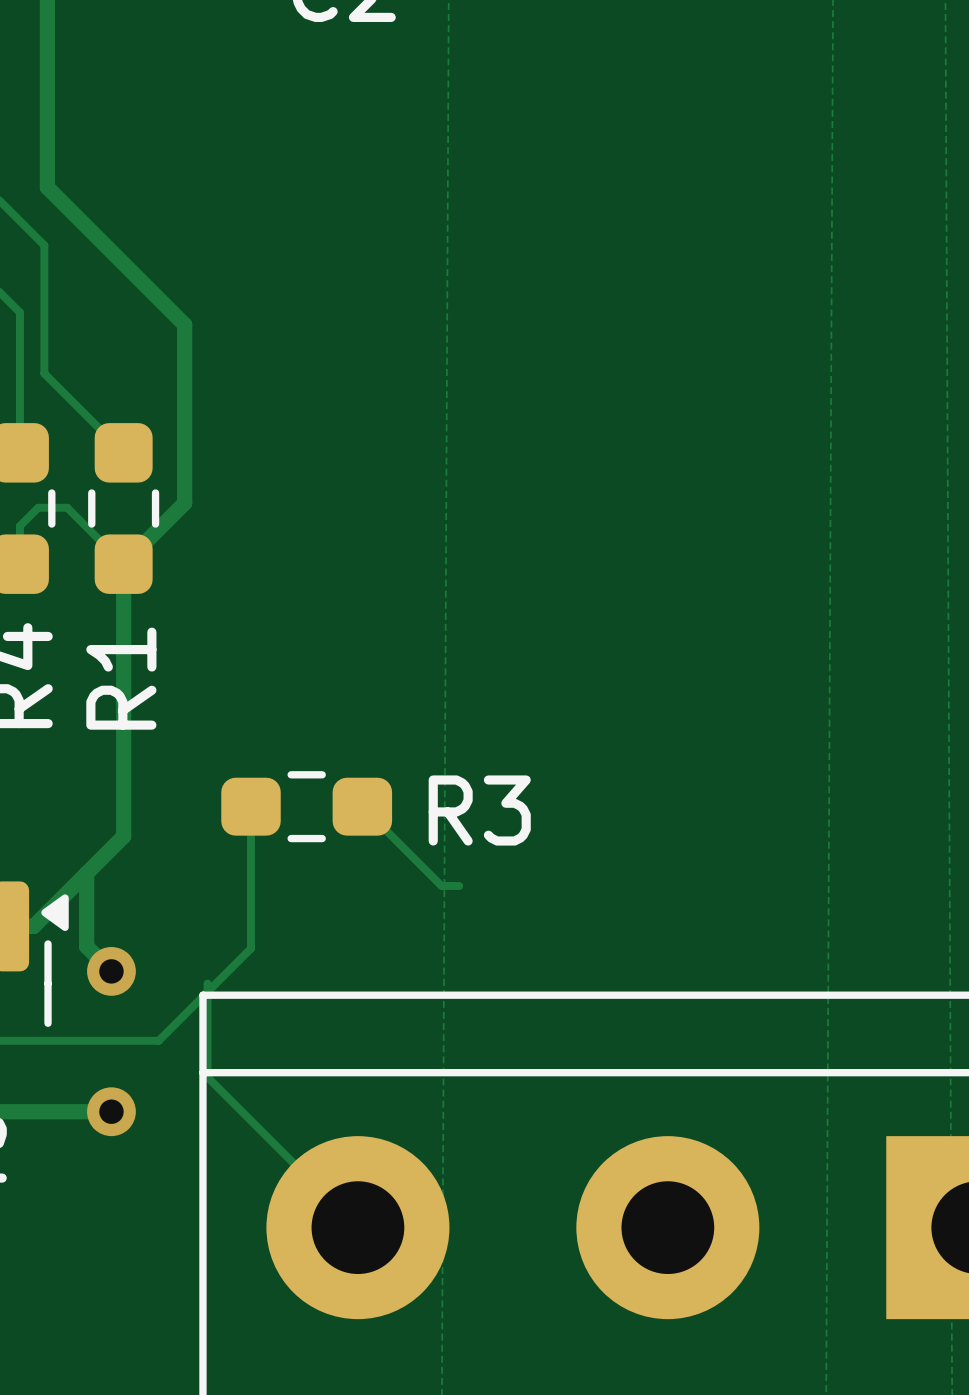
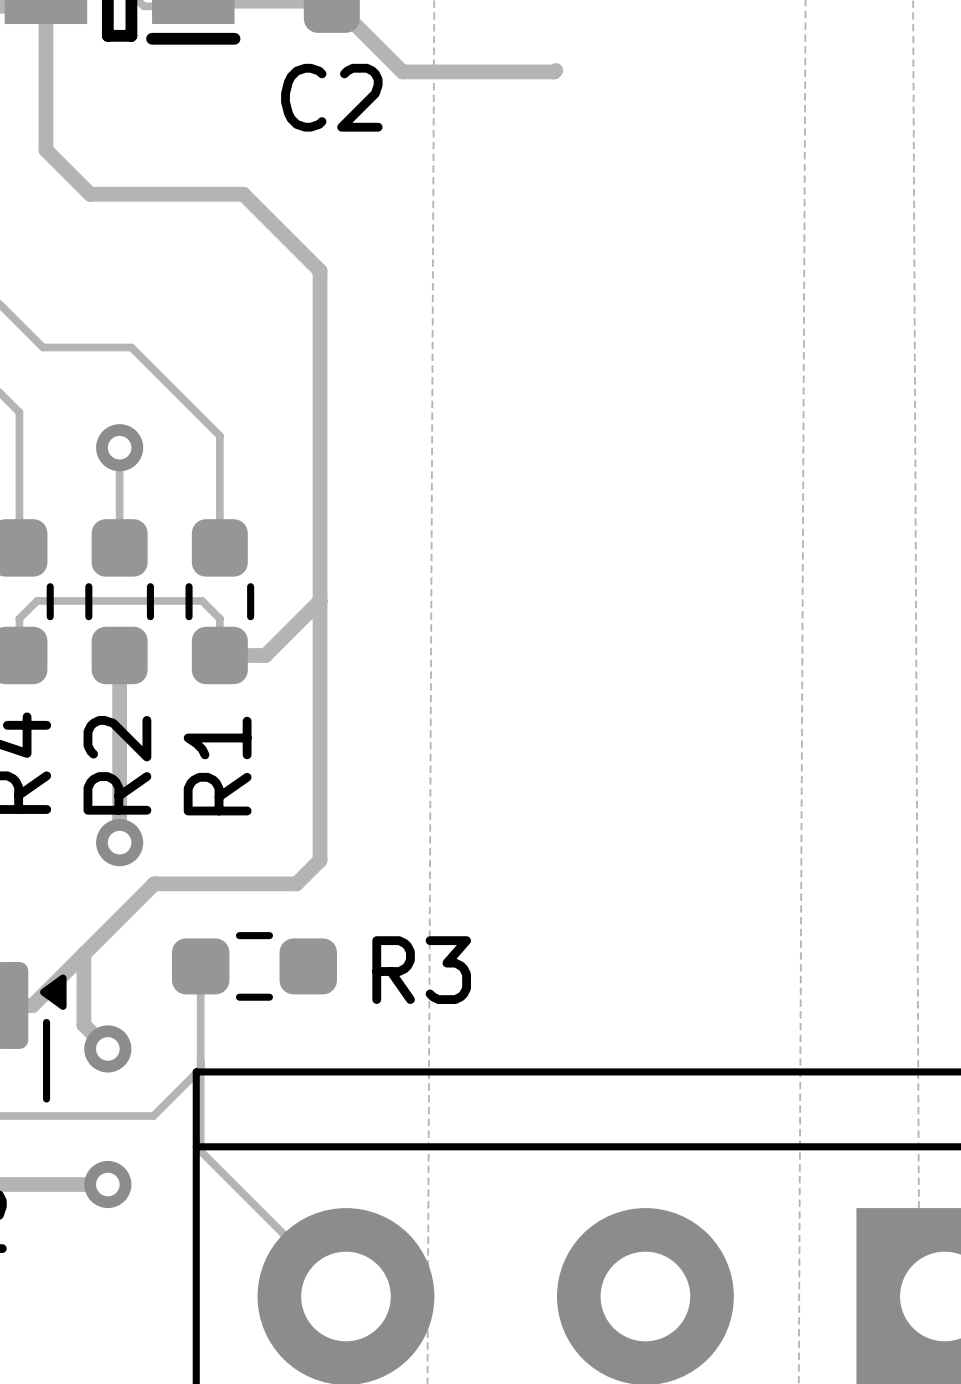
track: (47, 41) (47, 187) (184, 324) (184, 503) (123, 564) (67, 507) -> (45, 150) (90, 194) (243, 194) (320, 270) (320, 860) (296, 883) (154, 883) (119, 918)
track: (44, 245) (44, 373) (123, 452) -> (43, 347) (131, 347) (219, 435) (219, 547)
track: none -> (119, 447) (119, 547)
via: none -> (119, 447)
track: none -> (65, 600) (202, 600) (219, 618) (219, 655) (265, 655) (320, 600)
R1: none -> (219, 601)
R1 name: R1 (121, 678) -> R2 (117, 765)
track: (123, 757) (123, 836) -> none
via: none -> (119, 842)
track: (251, 806) (251, 948) (207, 991) -> none
R3 position: (306, 806) -> (254, 966)
track: (362, 806) (441, 885) (459, 885) -> none
track: none -> (200, 966) (200, 1060)

